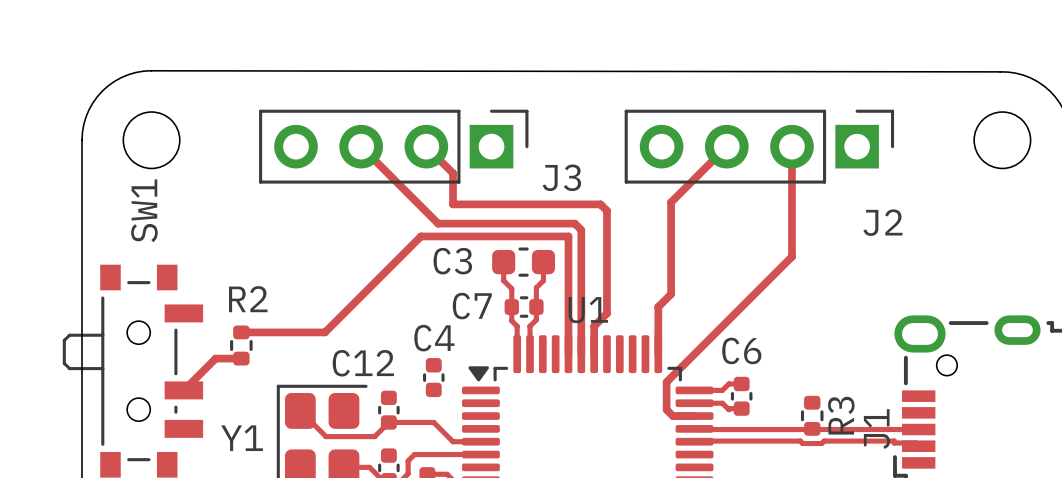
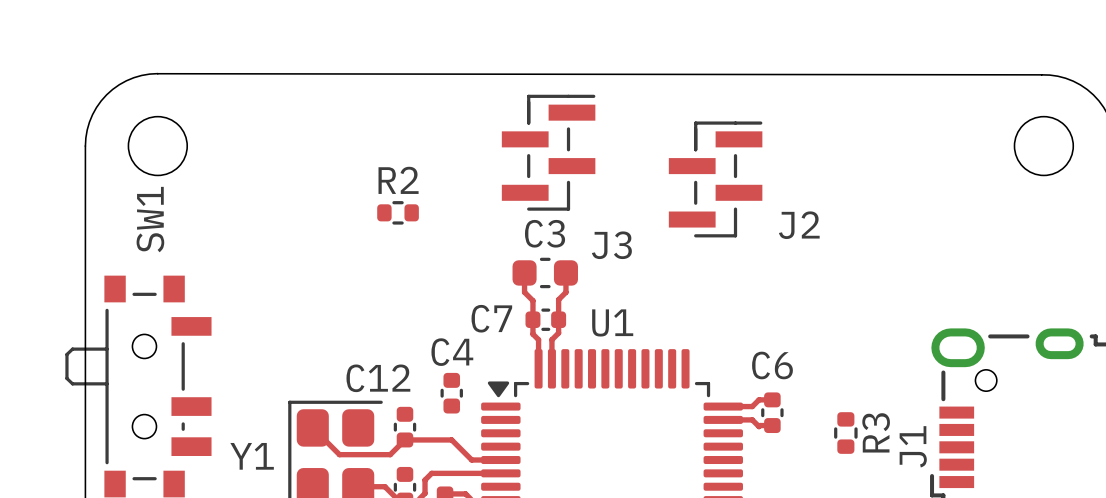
J3 footprint: [259, 109, 529, 184] -> [501, 94, 596, 211]
J2 footprint: [624, 109, 895, 184] -> [668, 121, 763, 238]
track: (361, 146) (438, 223) (574, 223) (581, 230) (581, 354) -> none
track: (426, 146) (453, 173) (453, 204) (600, 204) (606, 210) (606, 313) (594, 326) (594, 354) -> none
track: (726, 146) (671, 202) (671, 294) (658, 307) (658, 354) -> none
track: (791, 146) (791, 256) (666, 382) (666, 409) (672, 416) (694, 416) -> none
J3 name position: J3 (561, 177) -> J3 (611, 245)
J2 name position: J2 (882, 222) -> J2 (799, 225)
C3 name position: C3 (452, 261) -> C3 (545, 233)
track: (241, 332) (324, 332) (420, 236) (568, 236) (568, 354) -> none
R2 rotation: 0° (241, 345) -> 90° clockwise (398, 212)
R2 position: (241, 345) -> (398, 212)
track: (241, 358) (215, 358) (183, 390) -> none
track: (694, 428) (918, 429) -> none
track: (694, 441) (800, 441) (802, 443) (821, 443) (824, 441) (894, 441) (894, 443) (915, 443) (918, 446) -> none

